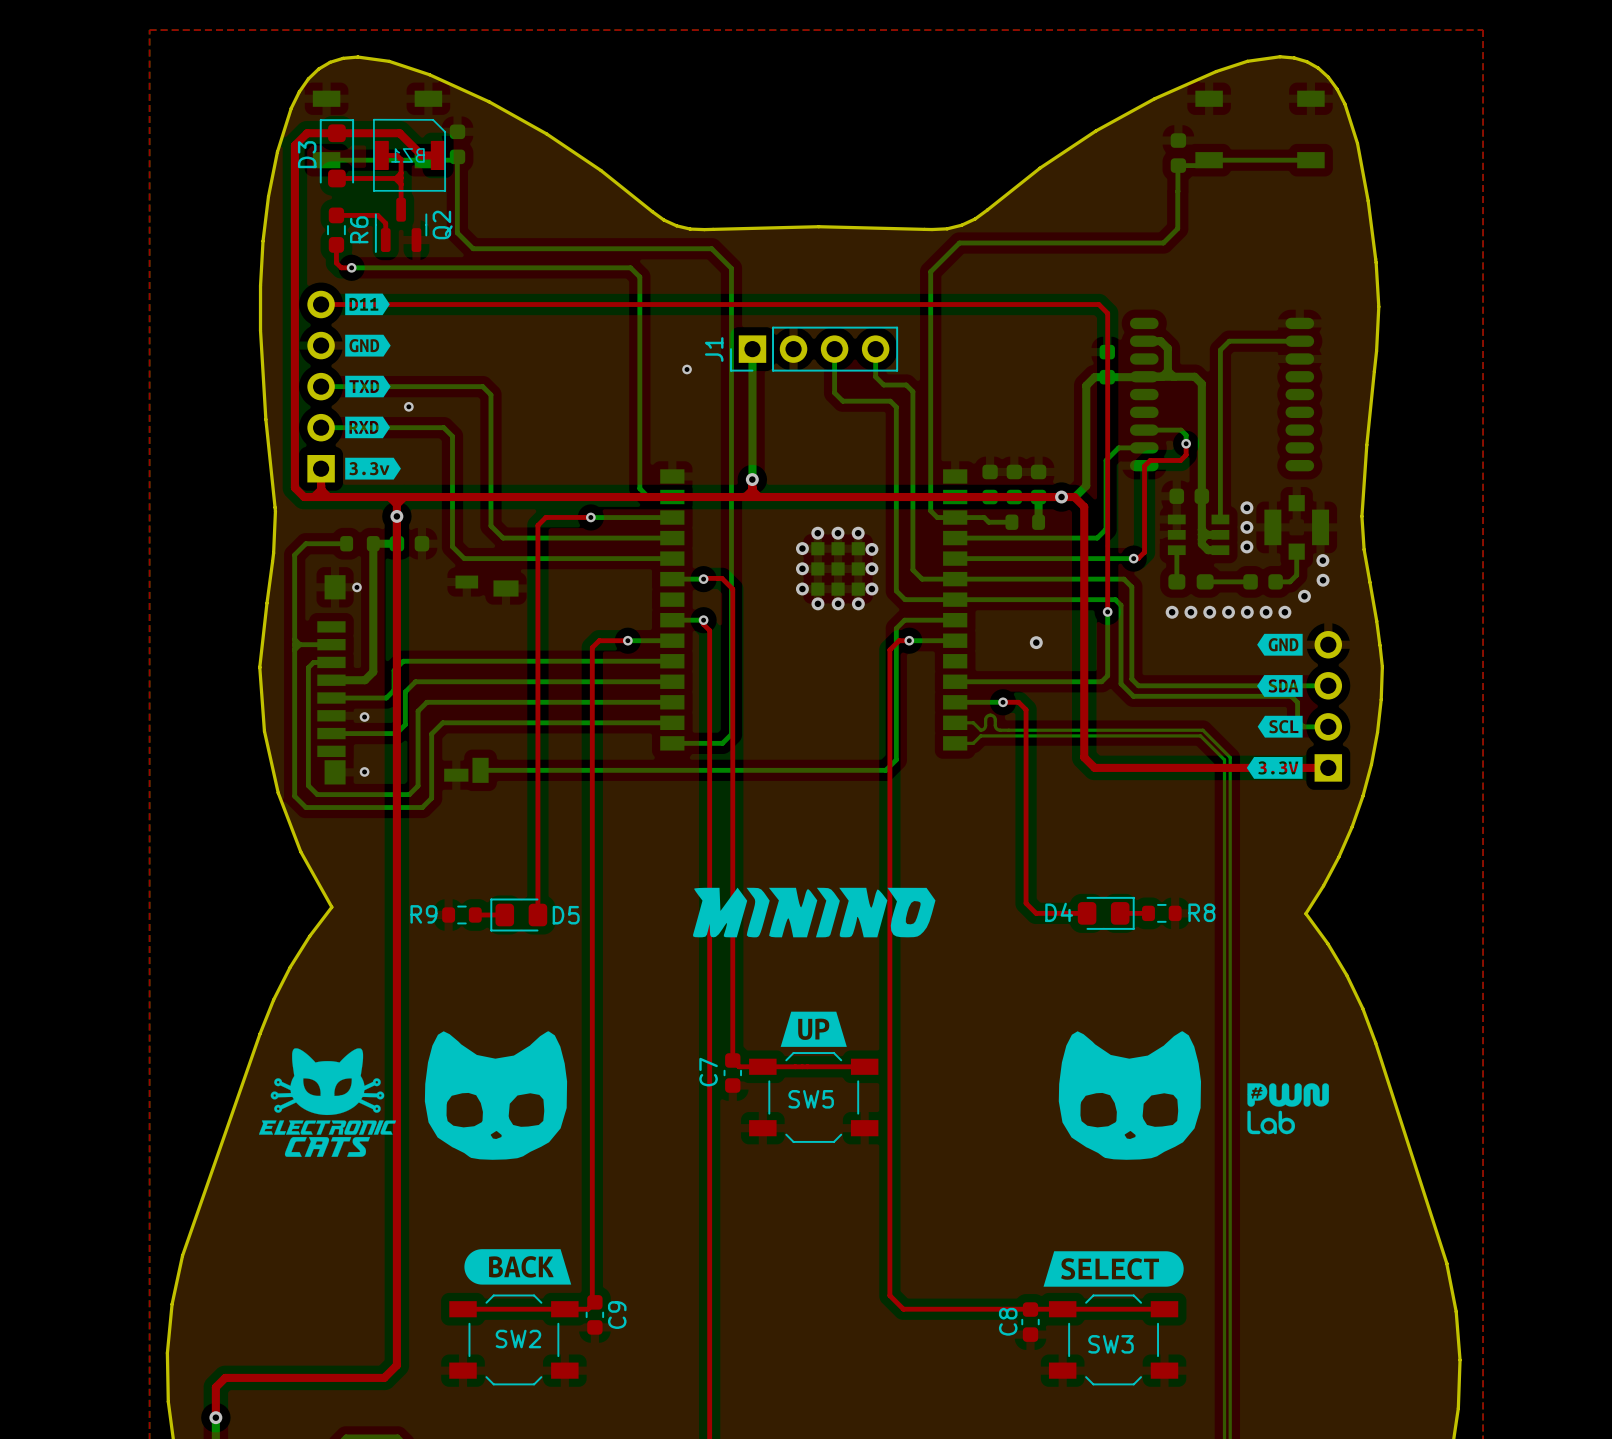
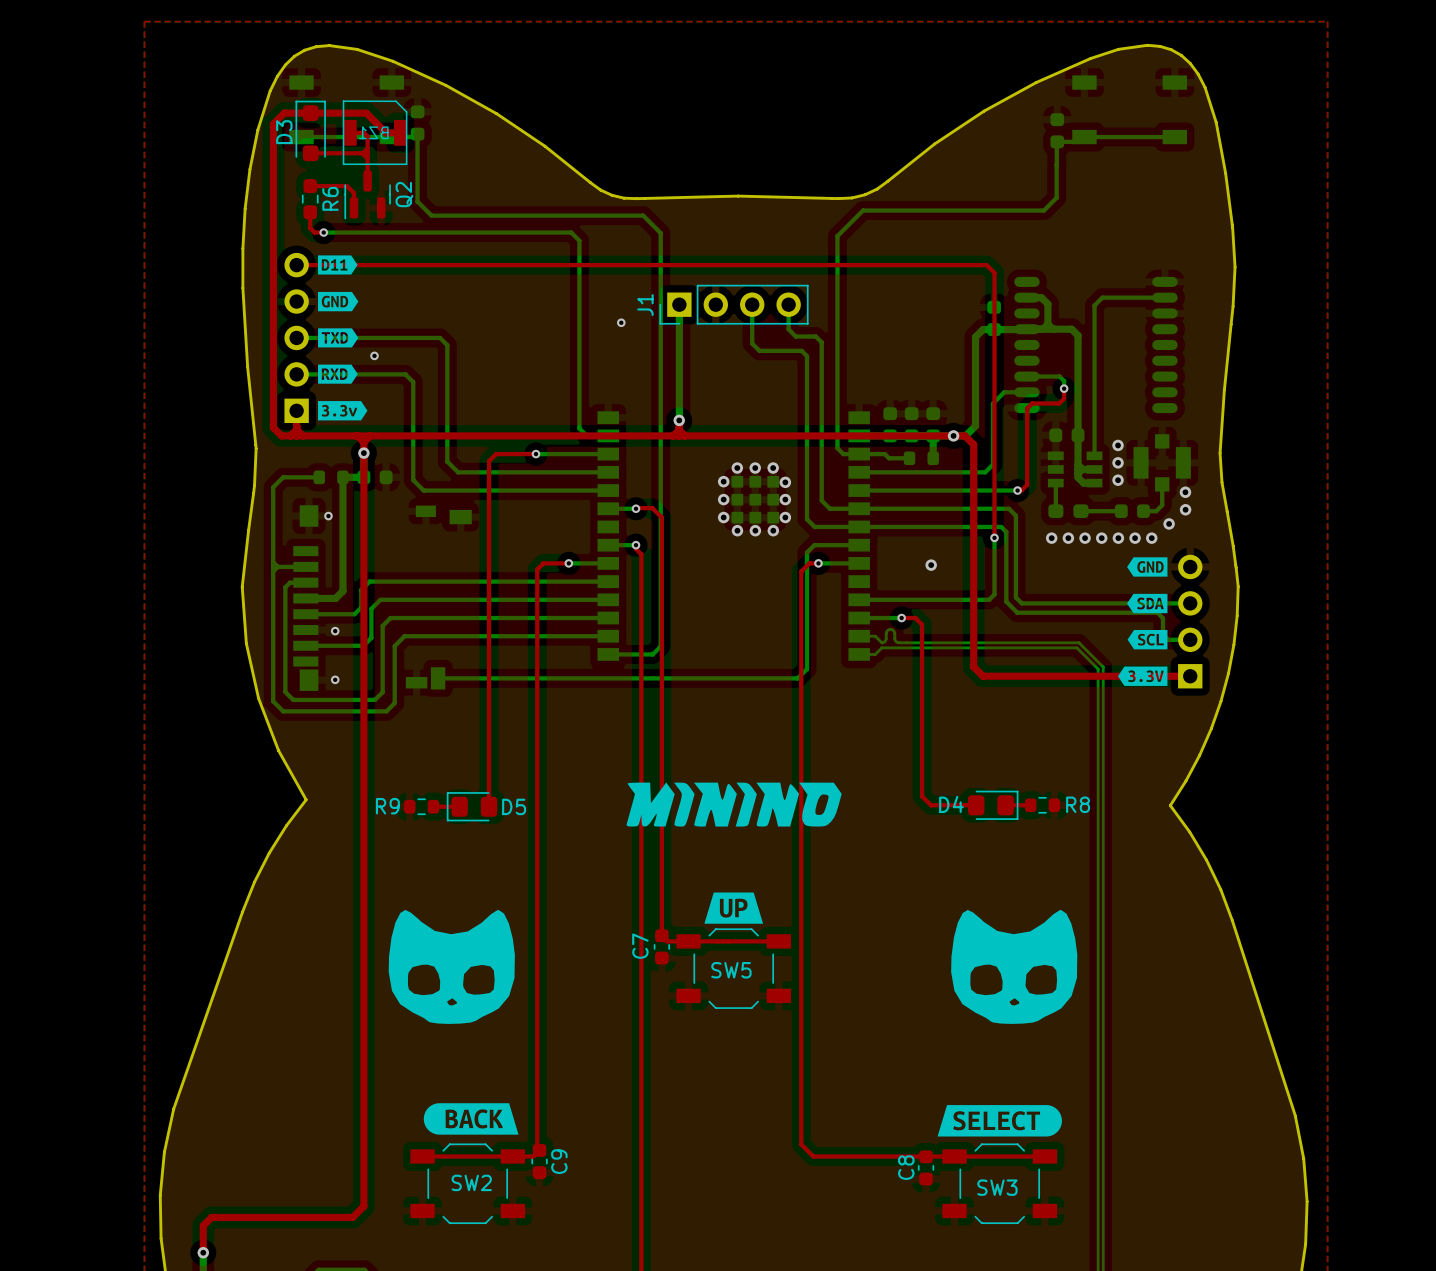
drawing: [258, 1048, 397, 1157] -> none
drawing: [1247, 1083, 1329, 1135] -> none

